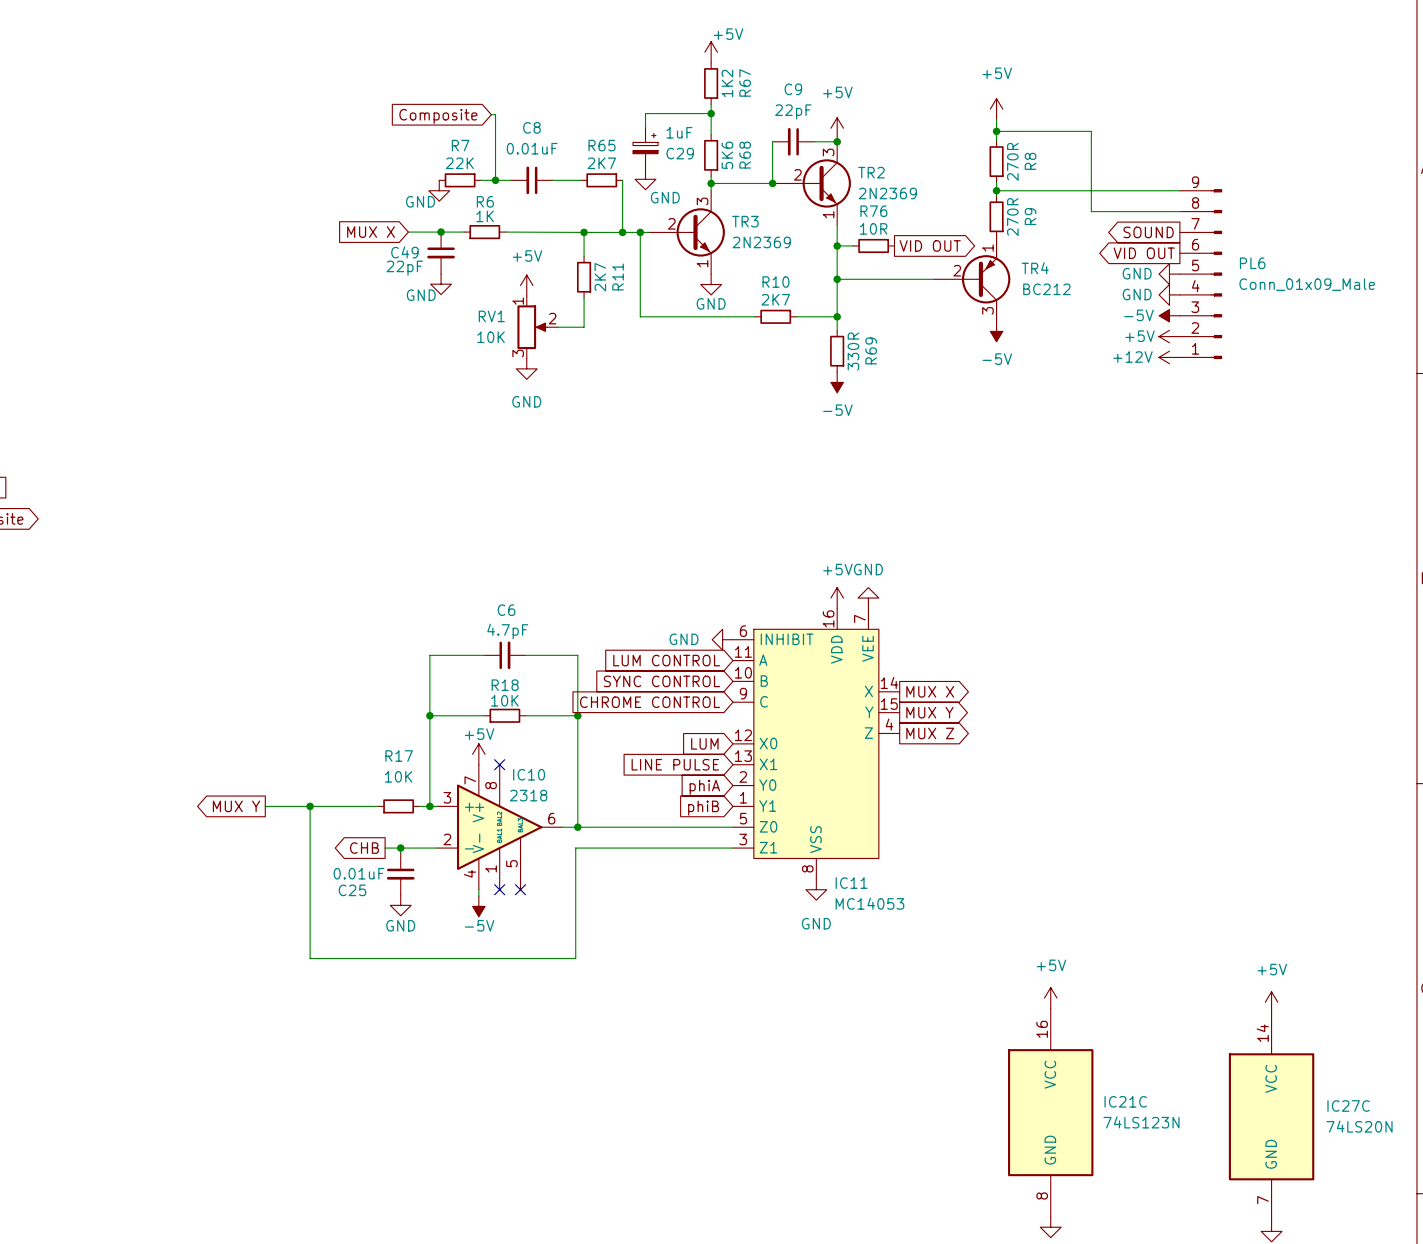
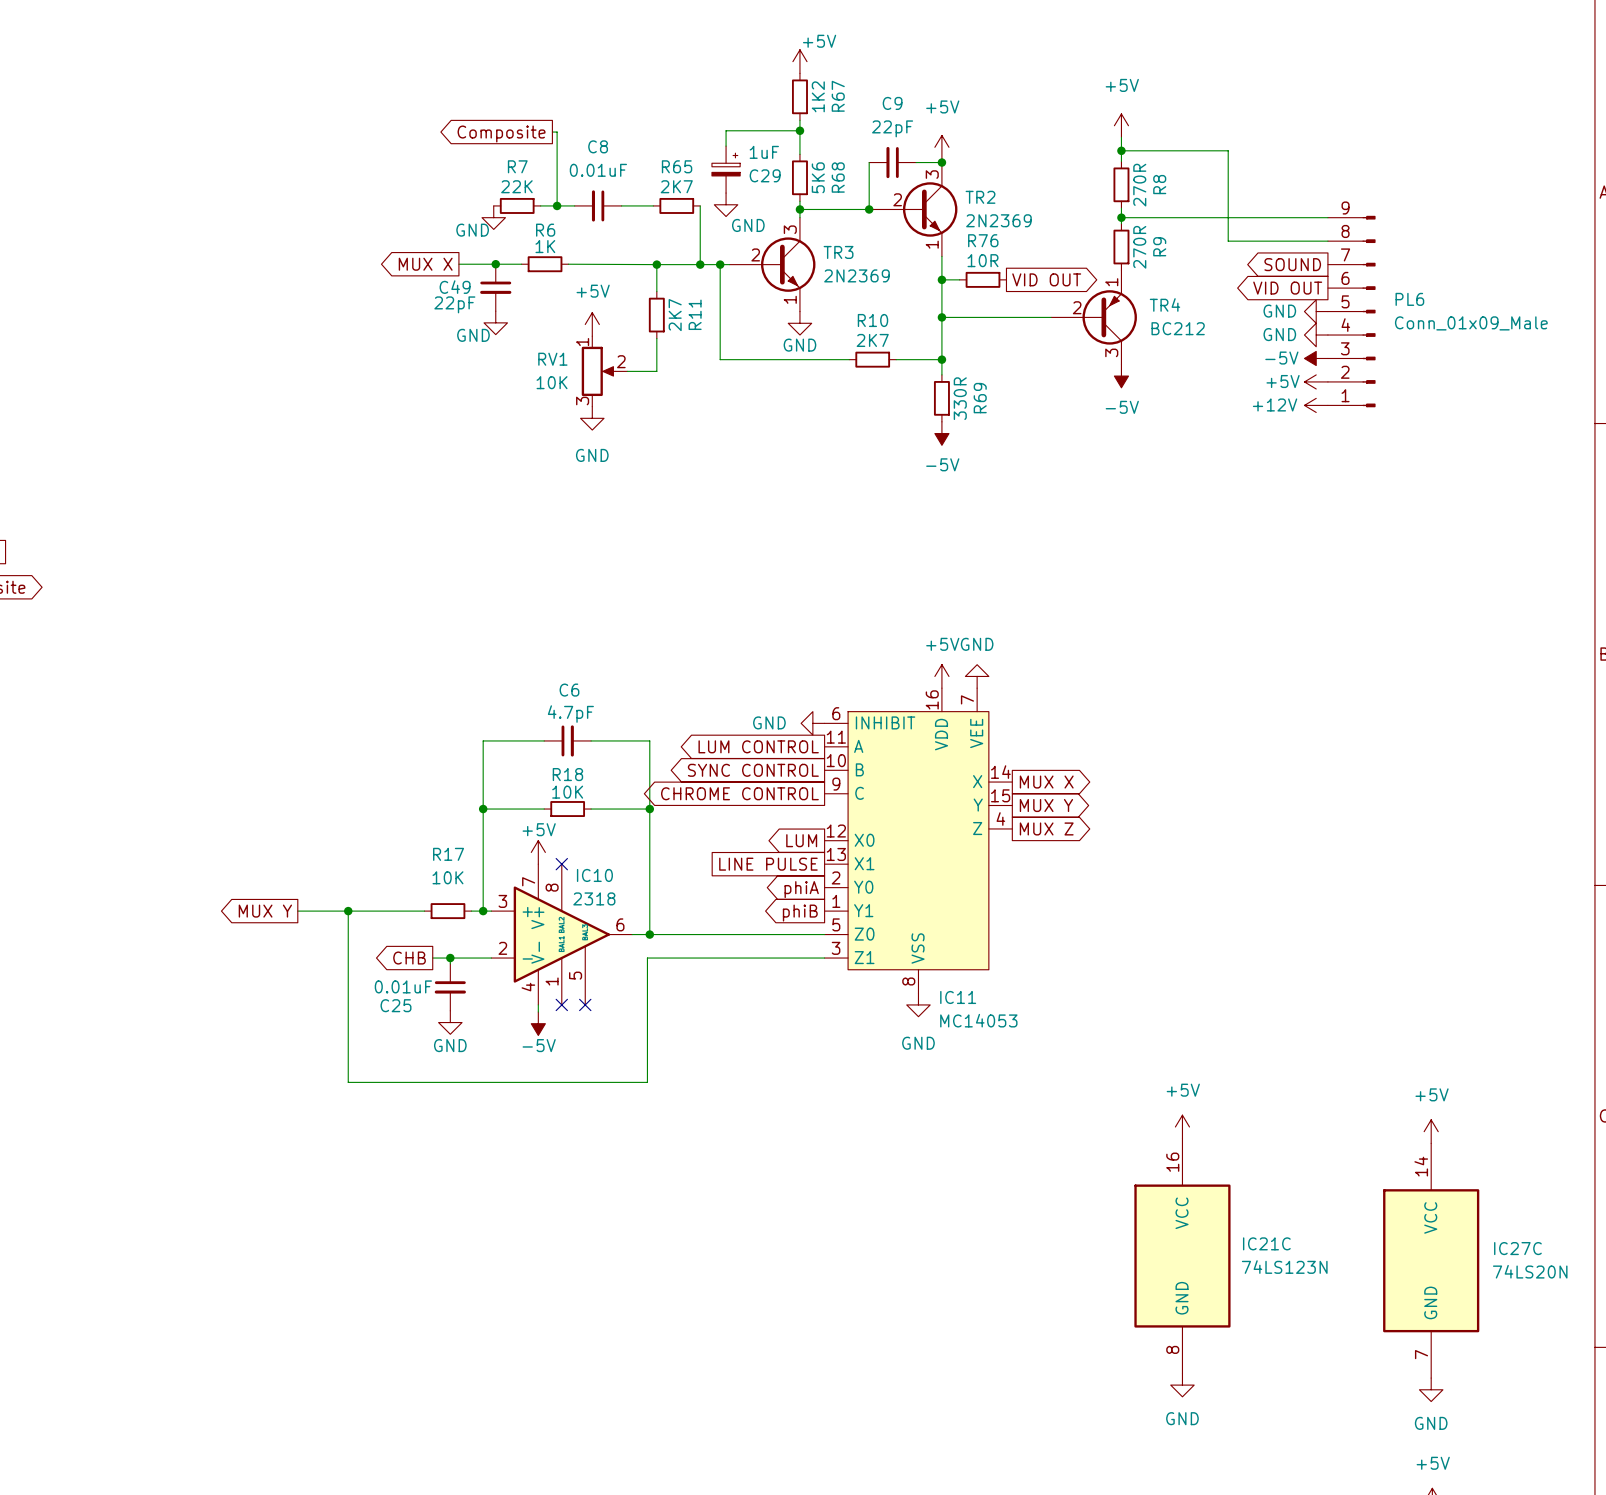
global label shape: input (438, 116) -> output (501, 133)
global label shape: input (371, 232) -> output (425, 264)
global label shape: input (666, 660) -> output (758, 746)
global label shape: input (661, 681) -> output (753, 770)
global label shape: input (650, 702) -> output (739, 793)
global label shape: input (704, 743) -> output (801, 840)
global label shape: input (675, 764) -> passive (768, 864)
global label shape: input (704, 787) -> output (801, 889)
global label shape: input (703, 808) -> output (800, 913)

